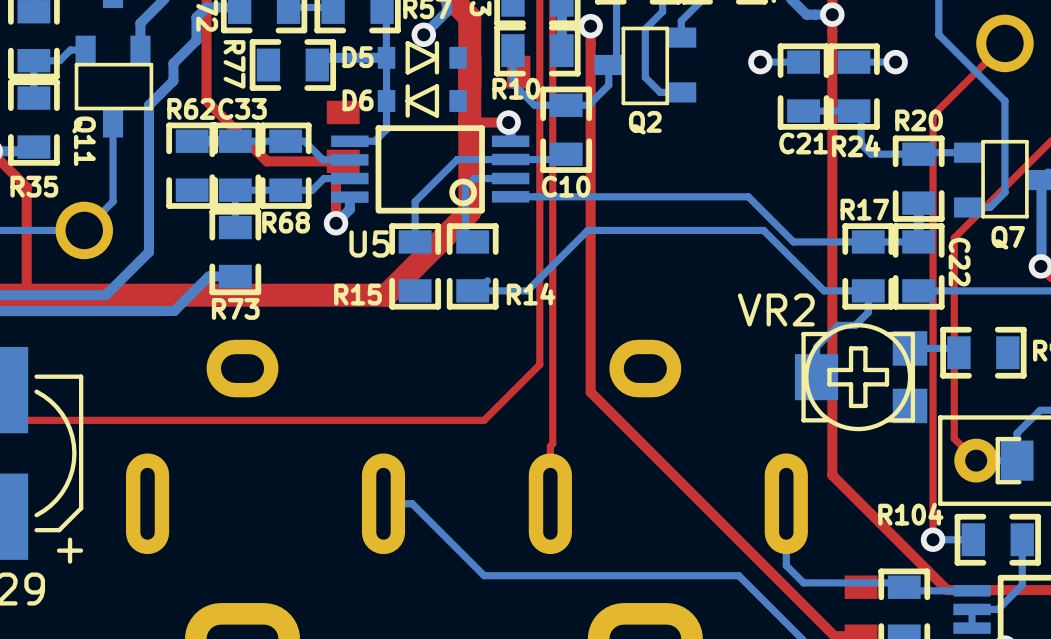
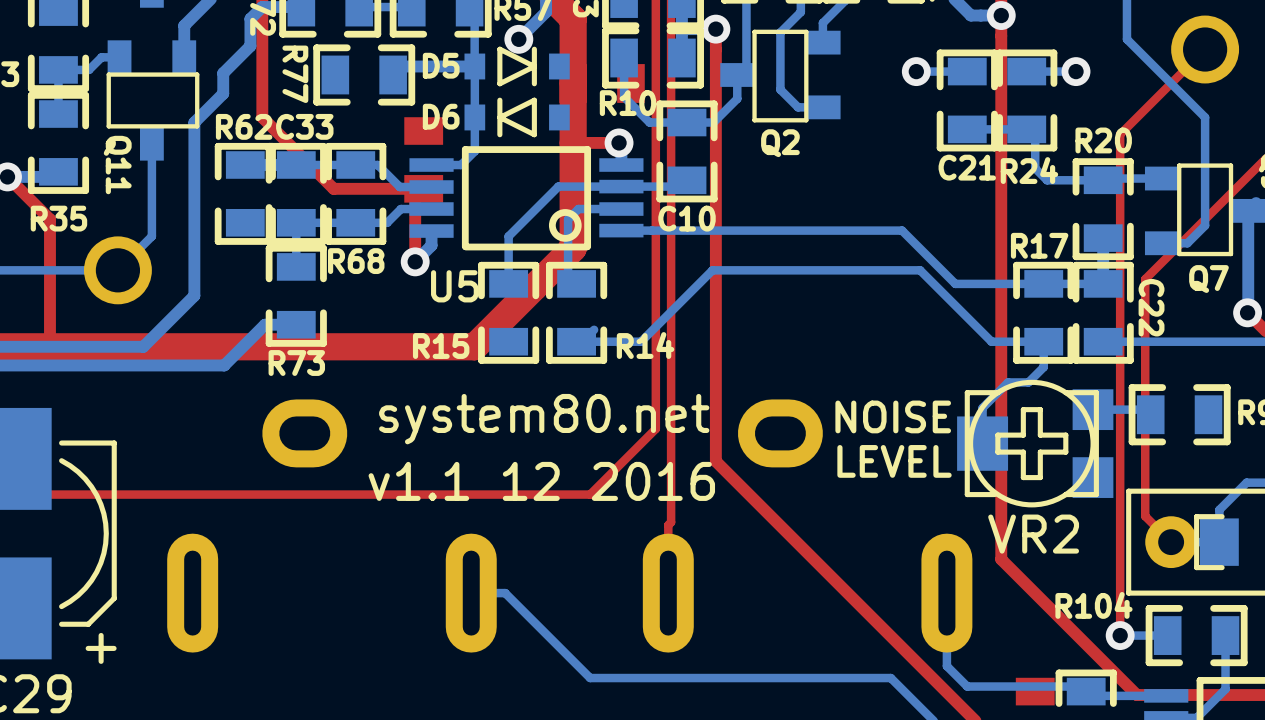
VR2 name position: VR2 (776, 309) -> VR2 (1033, 534)
text: none -> NOISE (893, 416)
text: none -> system80.net (544, 419)
text: none -> LEVEL (894, 461)
text: none -> v1.1 12 2016 (541, 481)

